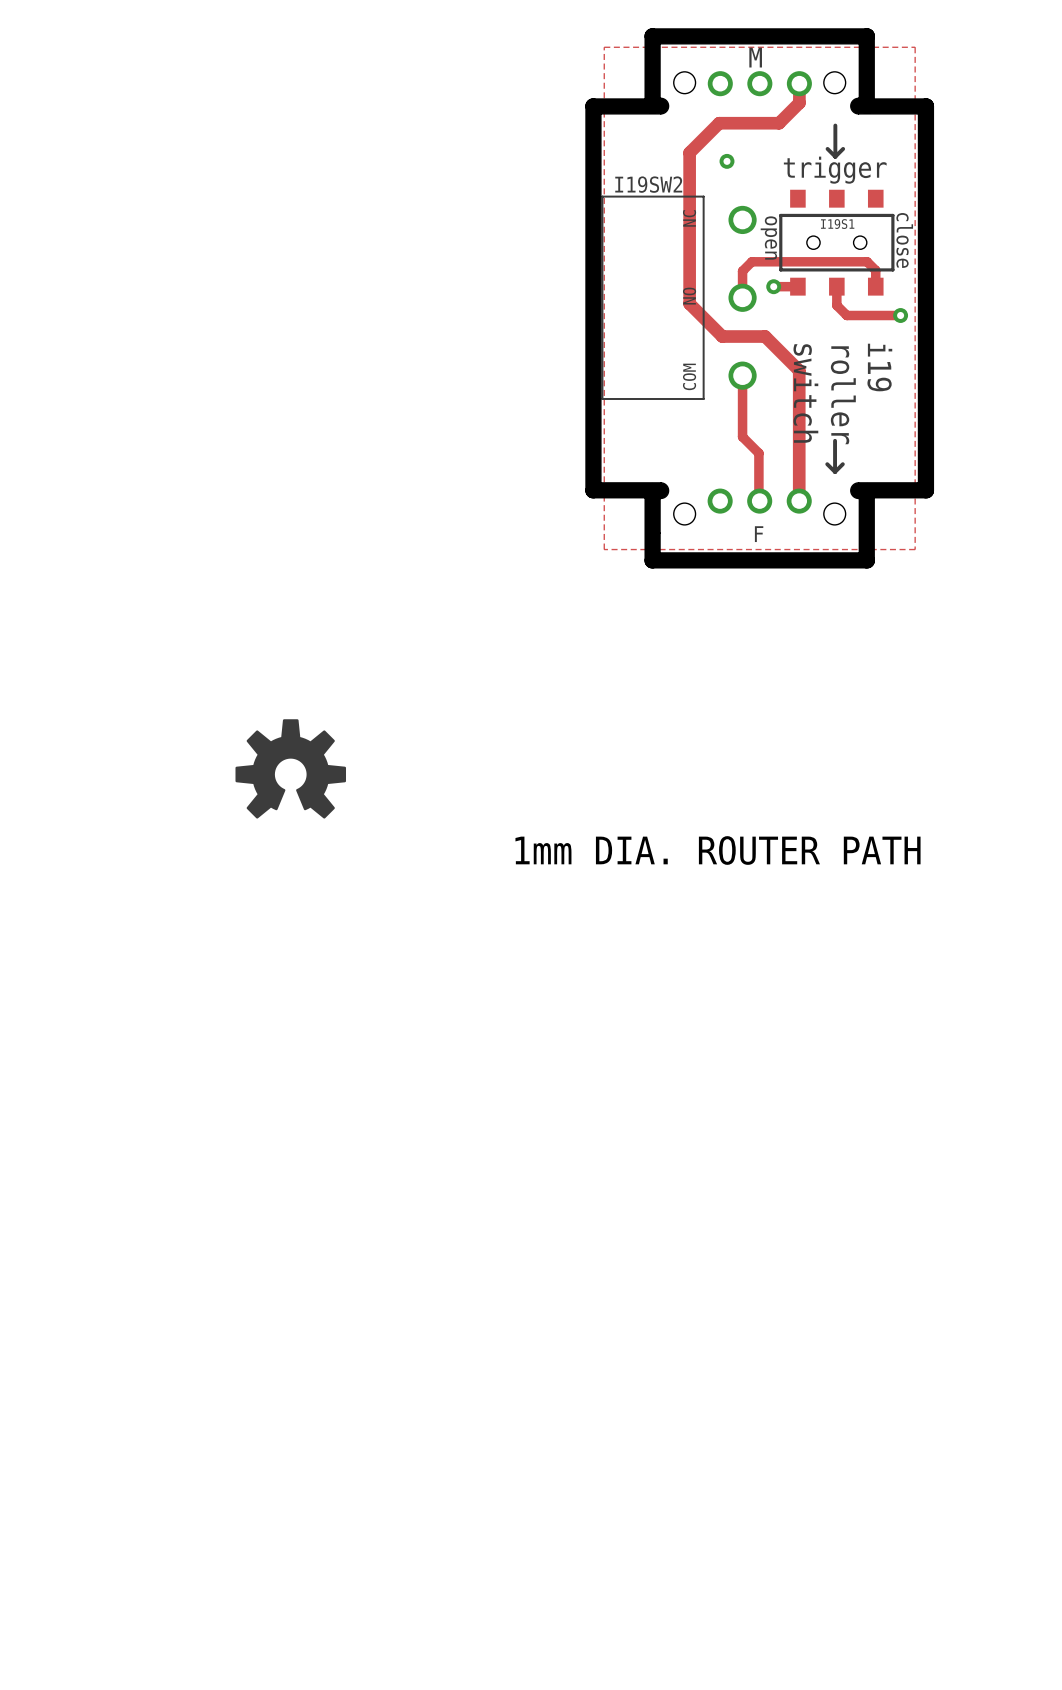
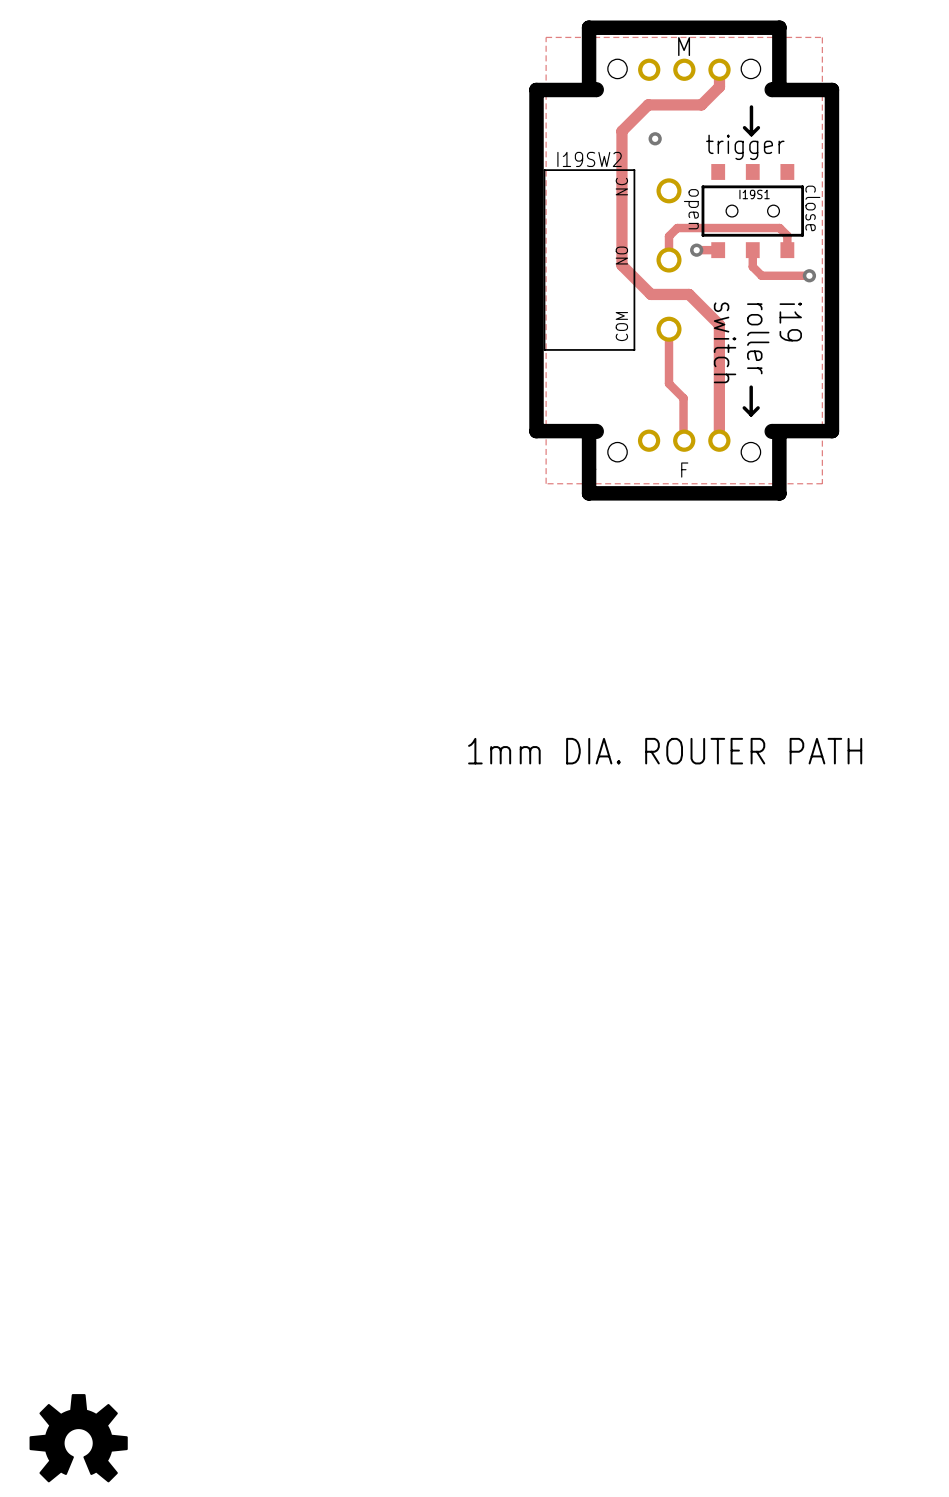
drawing: [235, 719, 347, 819] -> none
drawing: none -> [29, 1394, 128, 1483]

